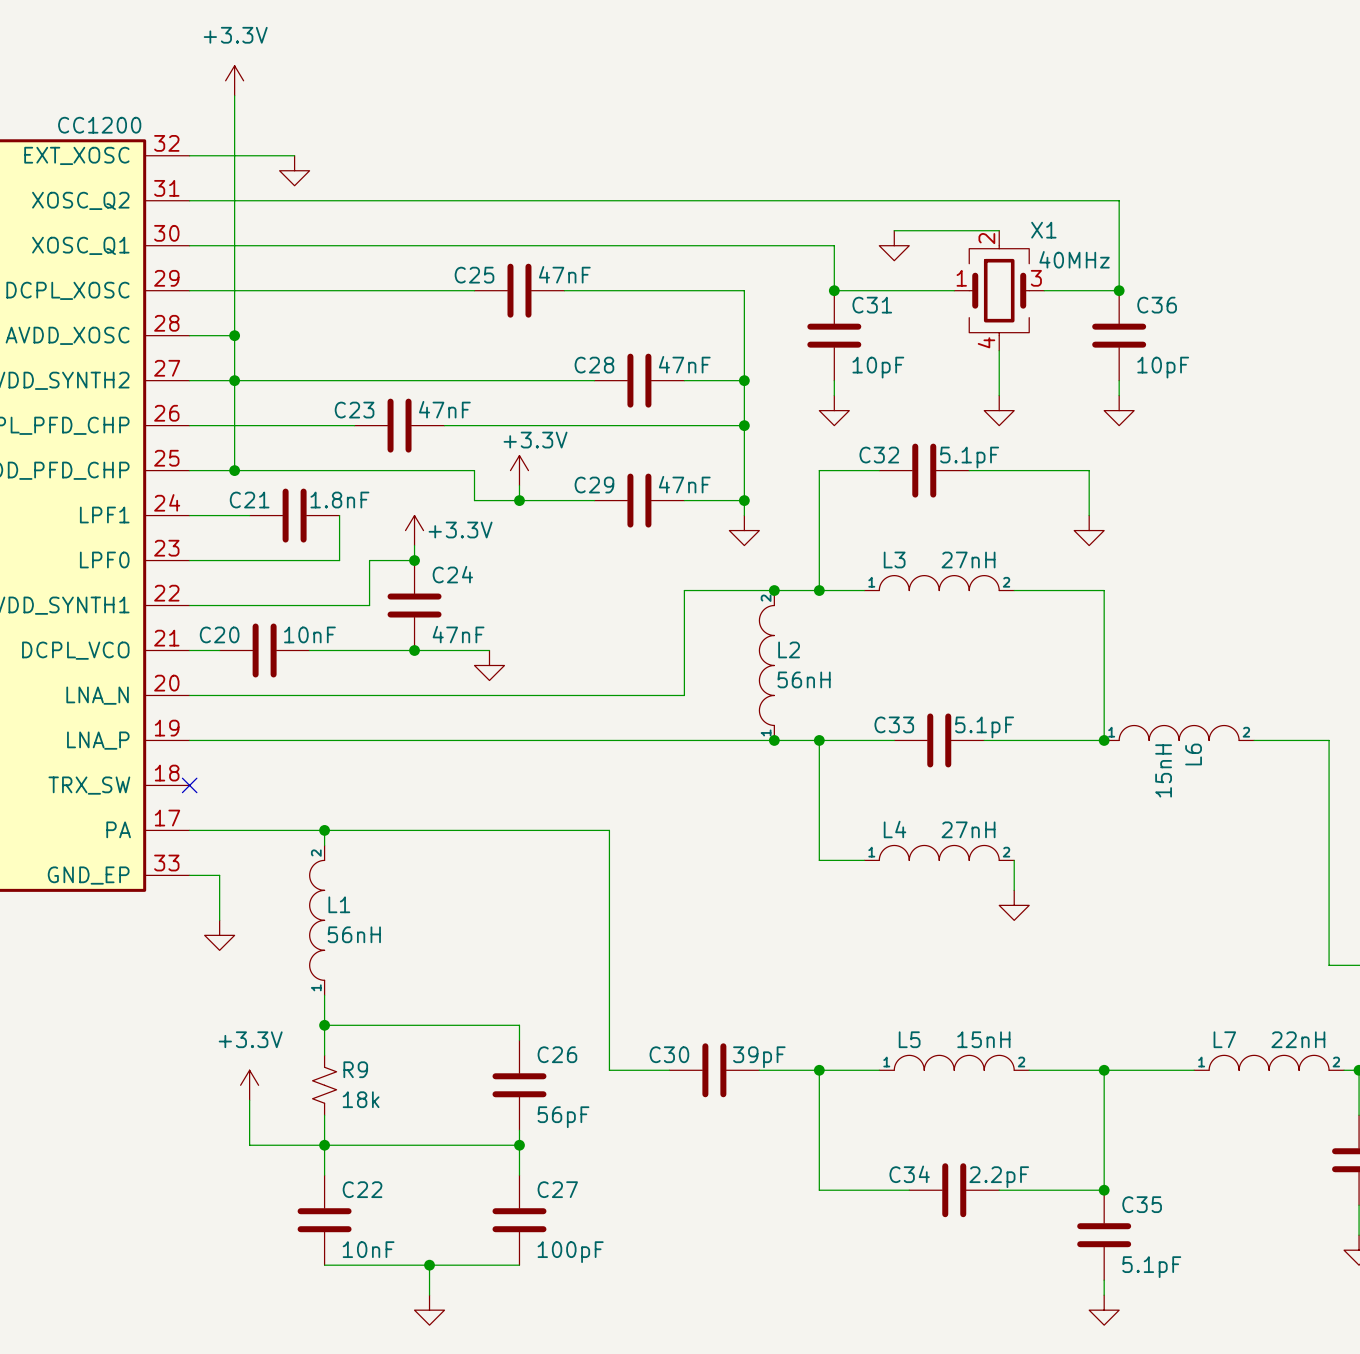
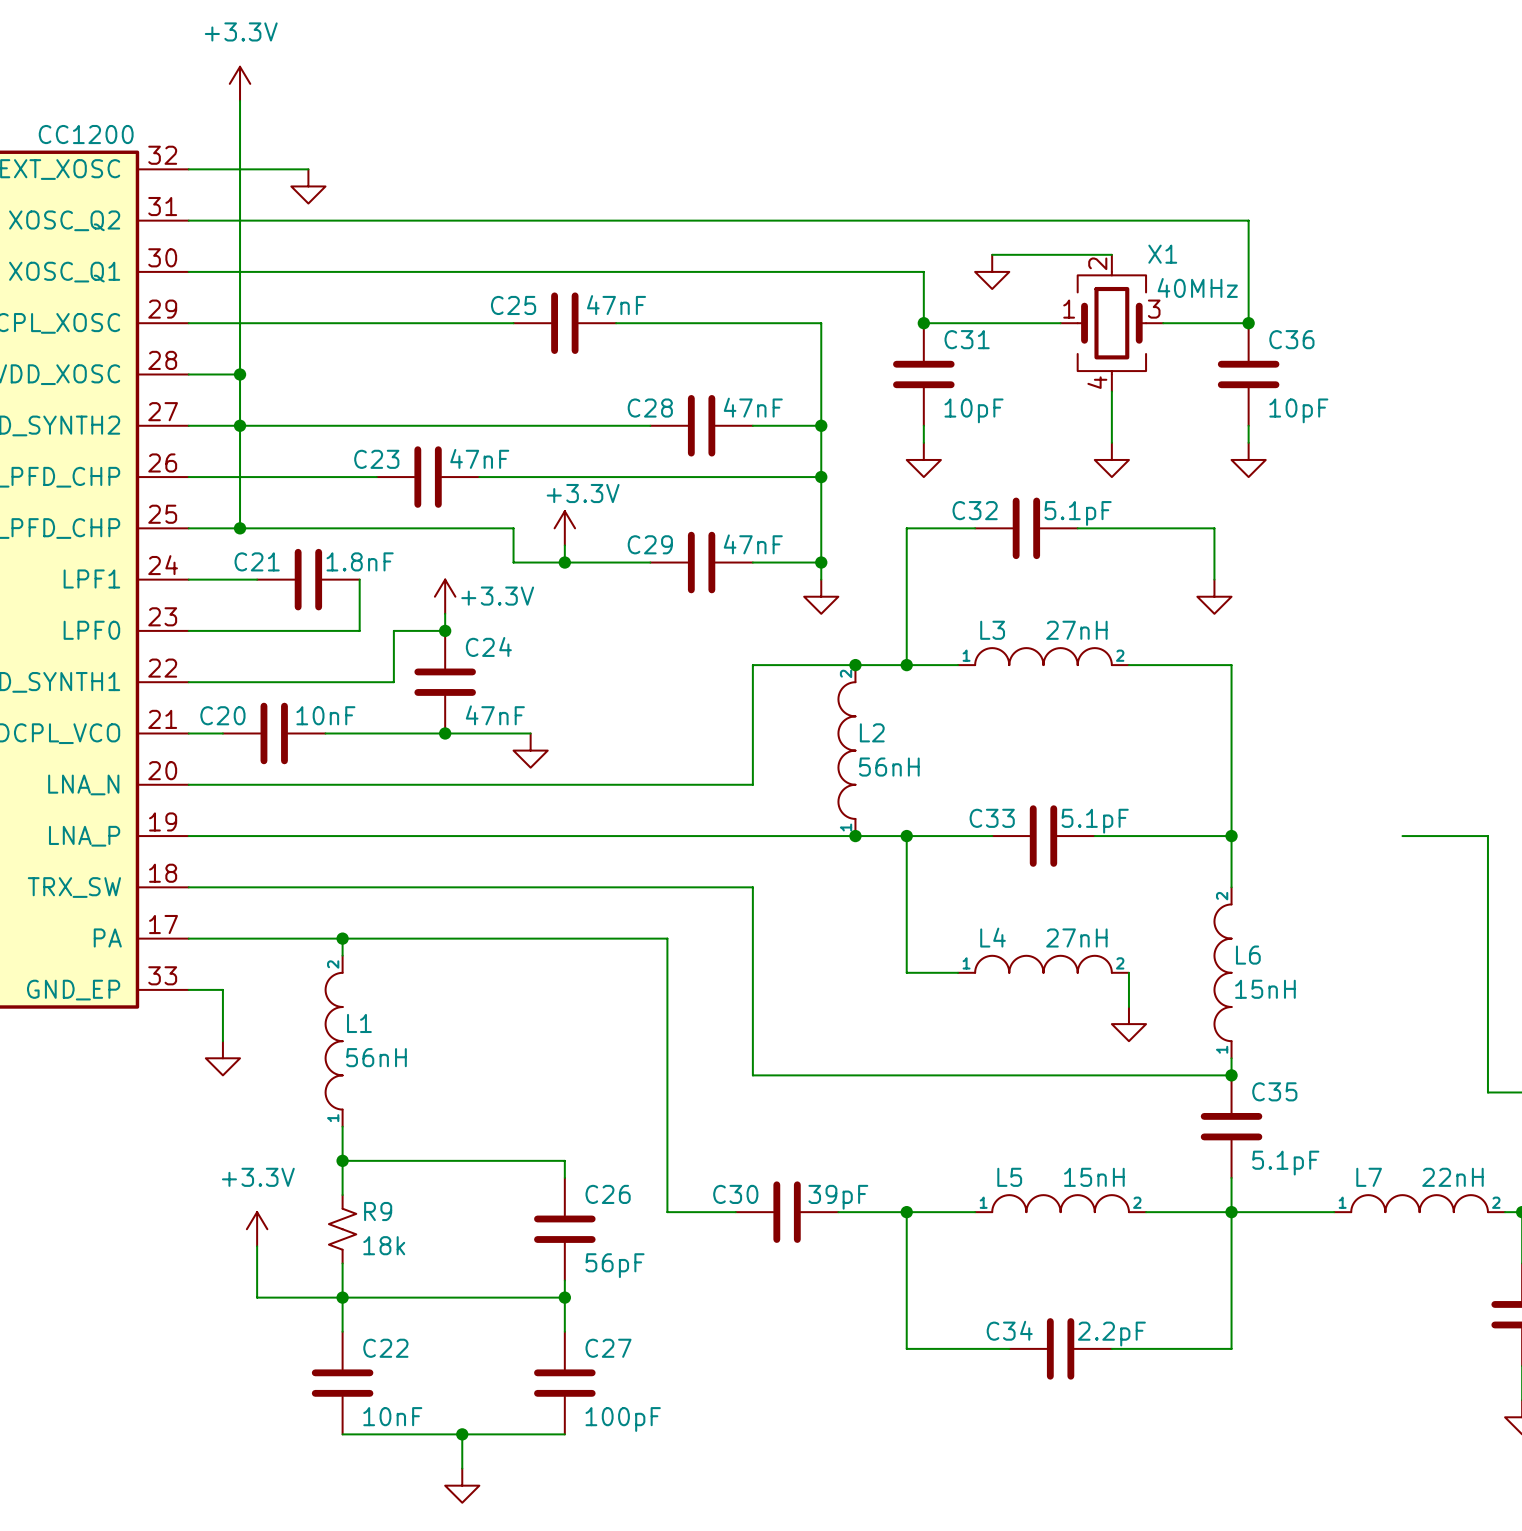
L6 symbol: [1104, 725, 1255, 741] -> [1214, 887, 1232, 1059]
wire: none -> (1231, 836) (1231, 887)
L6 name position: L6 (1193, 754) -> L6 (1248, 955)
L6 value position: 15nH (1163, 770) -> 15nH (1265, 989)
wire: none -> (188, 887) (752, 887) (752, 1075) (1231, 1075) (1231, 1058)
no-connect mark: (189, 785) -> none
junction: none -> (1231, 1075)
wire: none -> (1231, 1177) (1231, 1212)
junction: (1104, 1190) -> none
C35 position: (1104, 1235) -> (1231, 1126)
wire: (1104, 1280) (1104, 1295) -> none
power symbol: (1104, 1310) -> none

